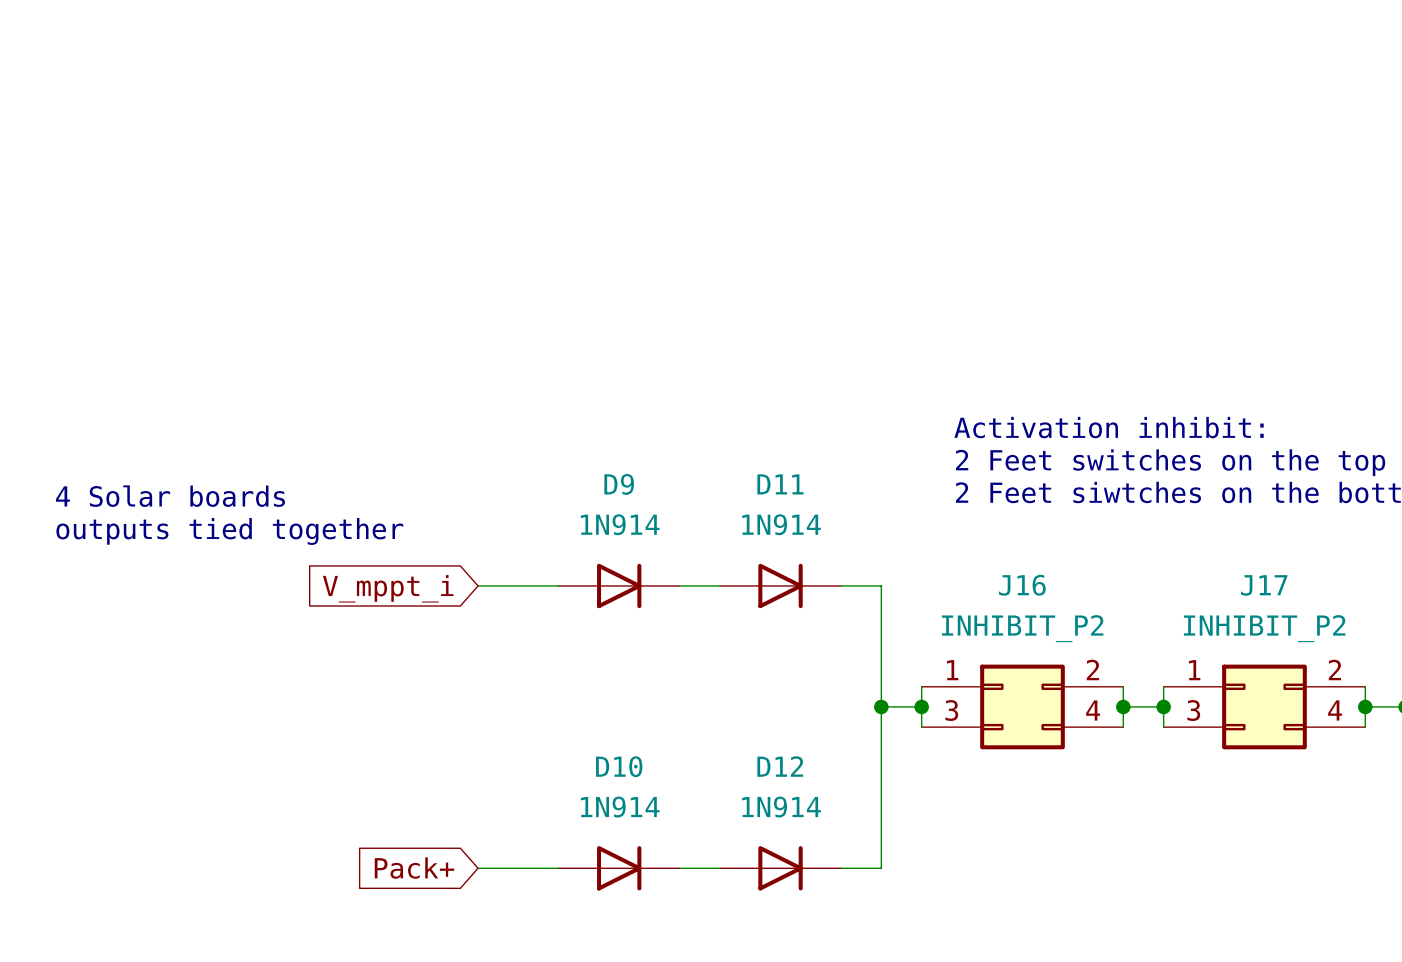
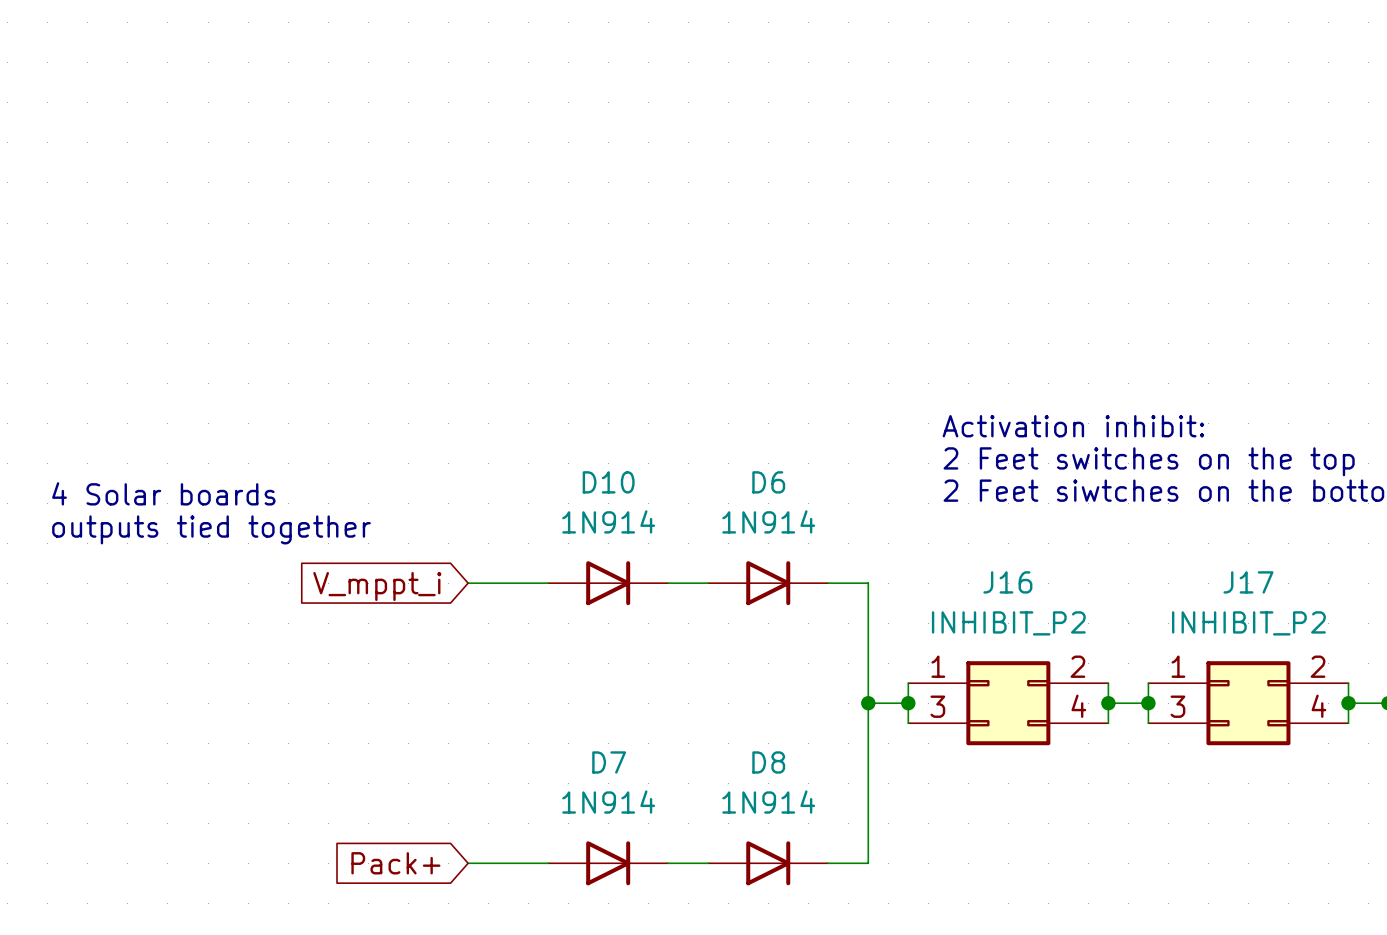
D9 name: D9 (619, 484) -> D10 (608, 482)
D11 name: D11 (780, 484) -> D6 (768, 482)
D10 name: D10 (619, 766) -> D7 (609, 762)
D12 name: D12 (780, 766) -> D8 (768, 762)

